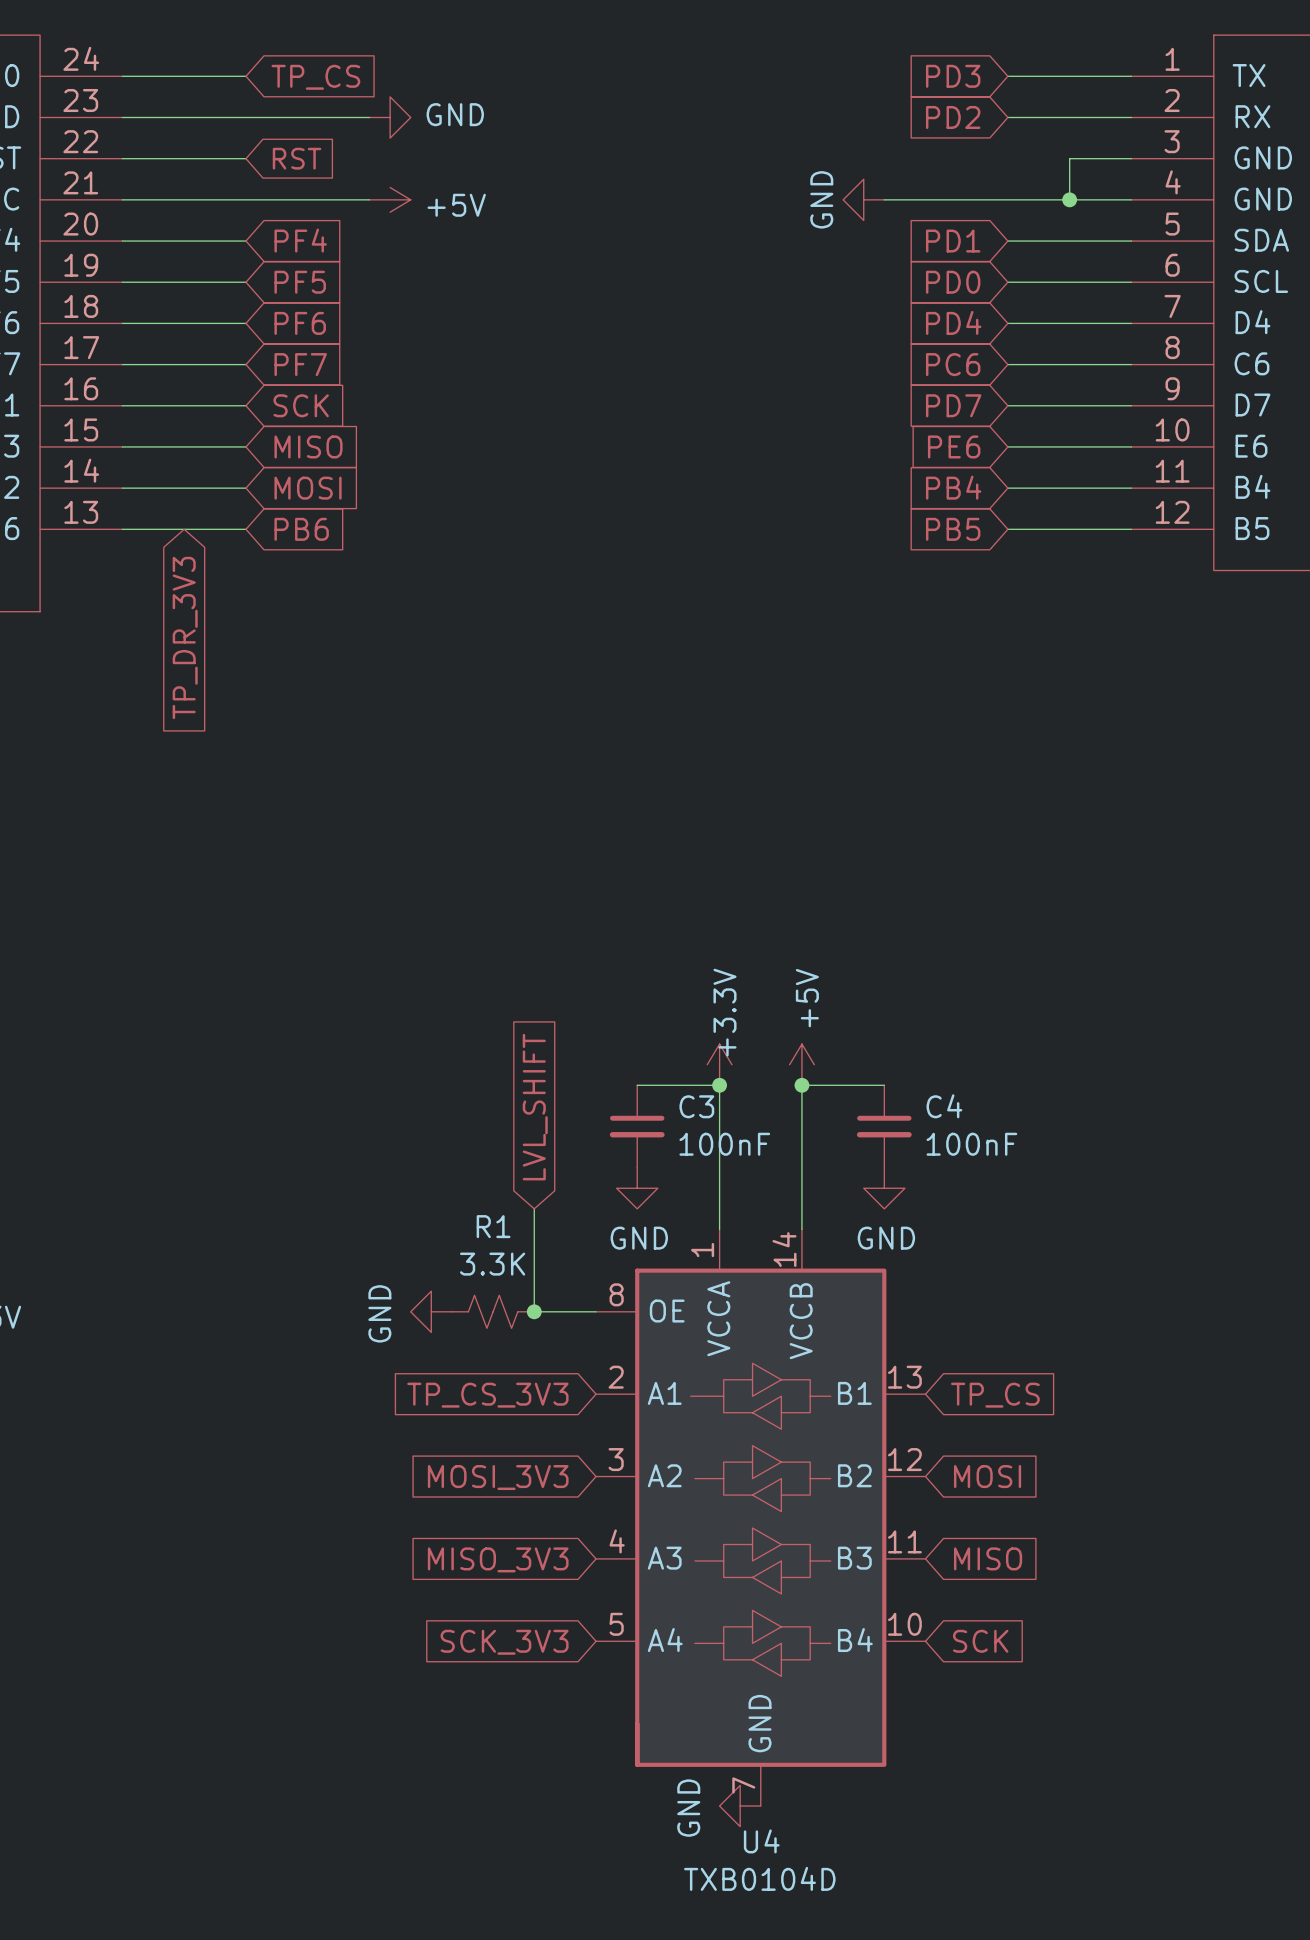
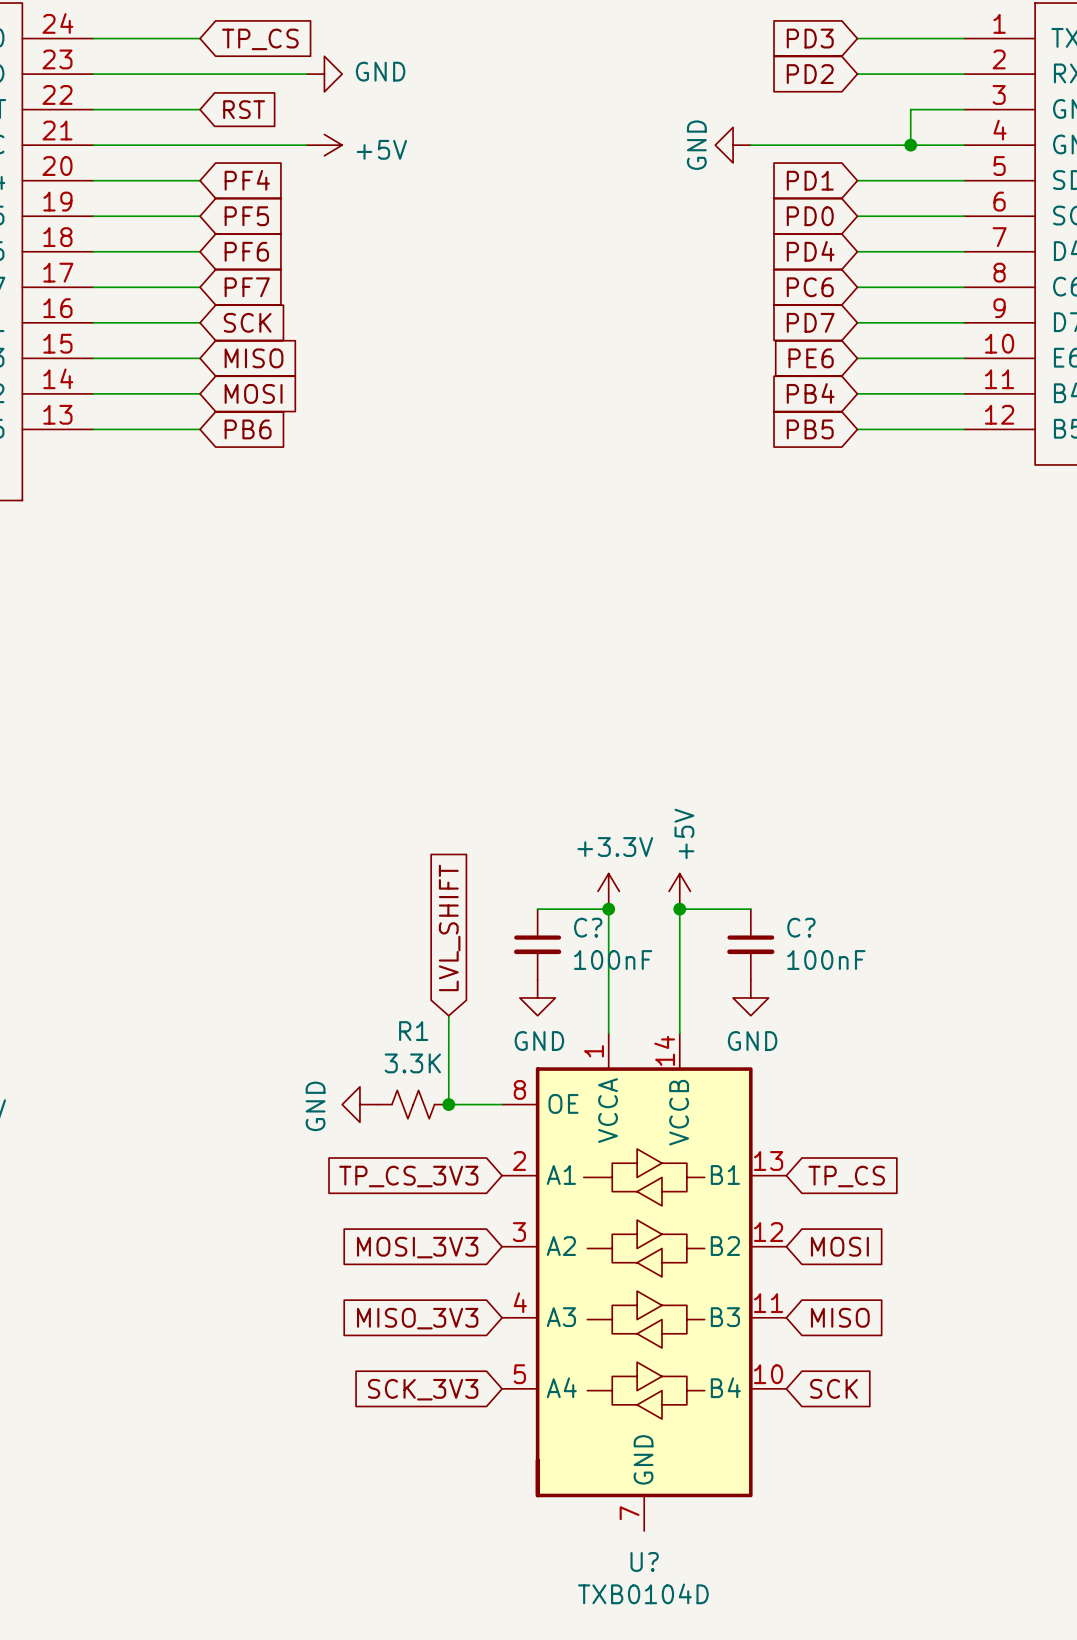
global label: TP_DR_3V3 (185, 637) -> none
power symbol text rotation: 0° (725, 1012) -> 90° clockwise (615, 847)
C3 name: C3 (696, 1106) -> C? (588, 927)
C4 name: C4 (944, 1106) -> C? (801, 927)
power symbol: GND (740, 1806) -> none
U4 name: U4 (761, 1841) -> U? (644, 1561)

